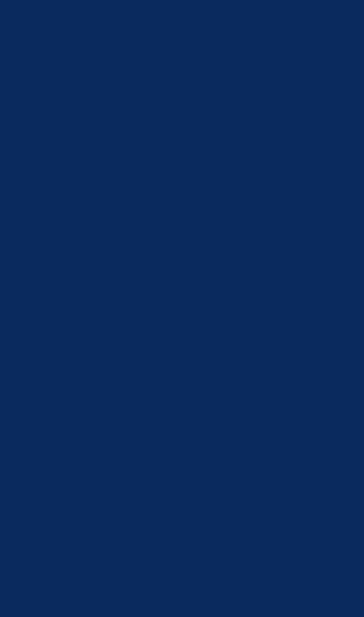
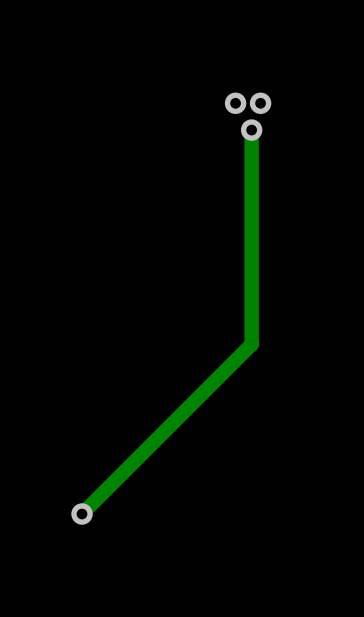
via: none -> (235, 103)
via: none -> (260, 103)
track: none -> (251, 130) (251, 344) (82, 514)
via: none -> (251, 130)
via: none -> (82, 514)

